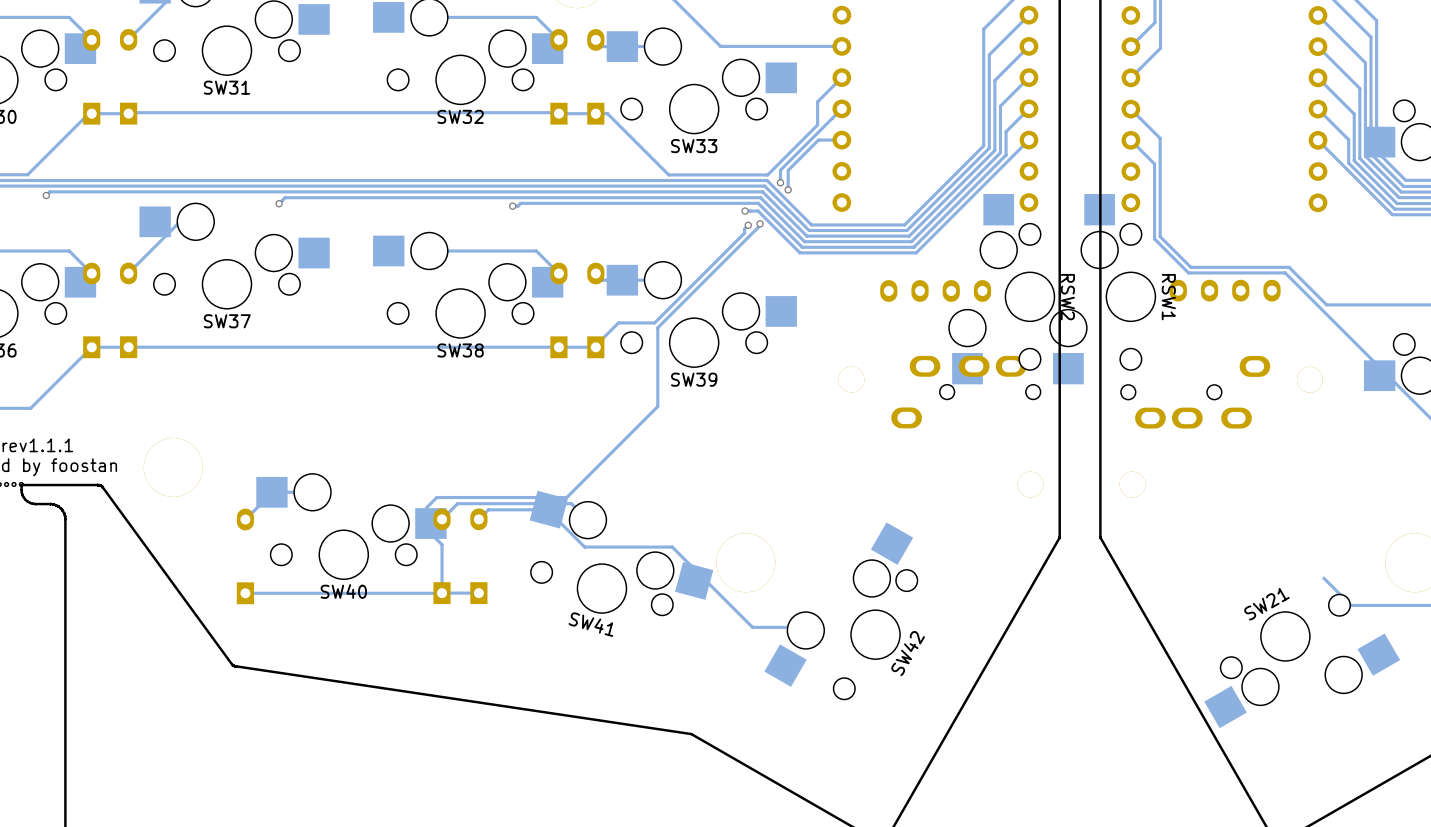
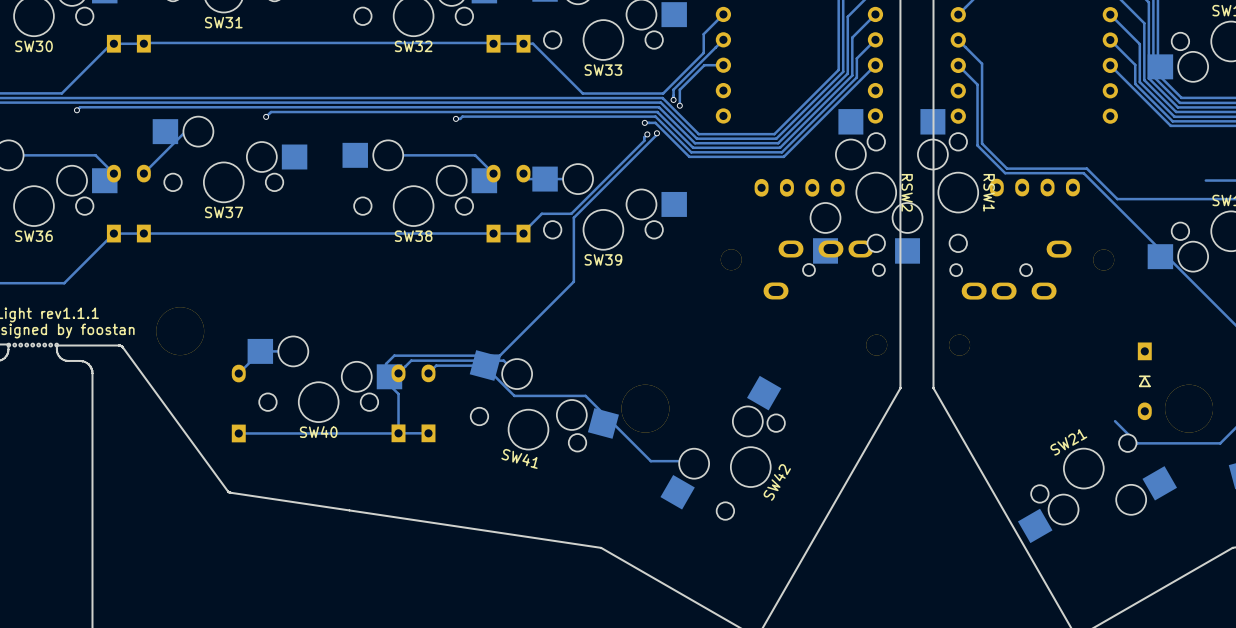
part: none -> (1144, 381)

